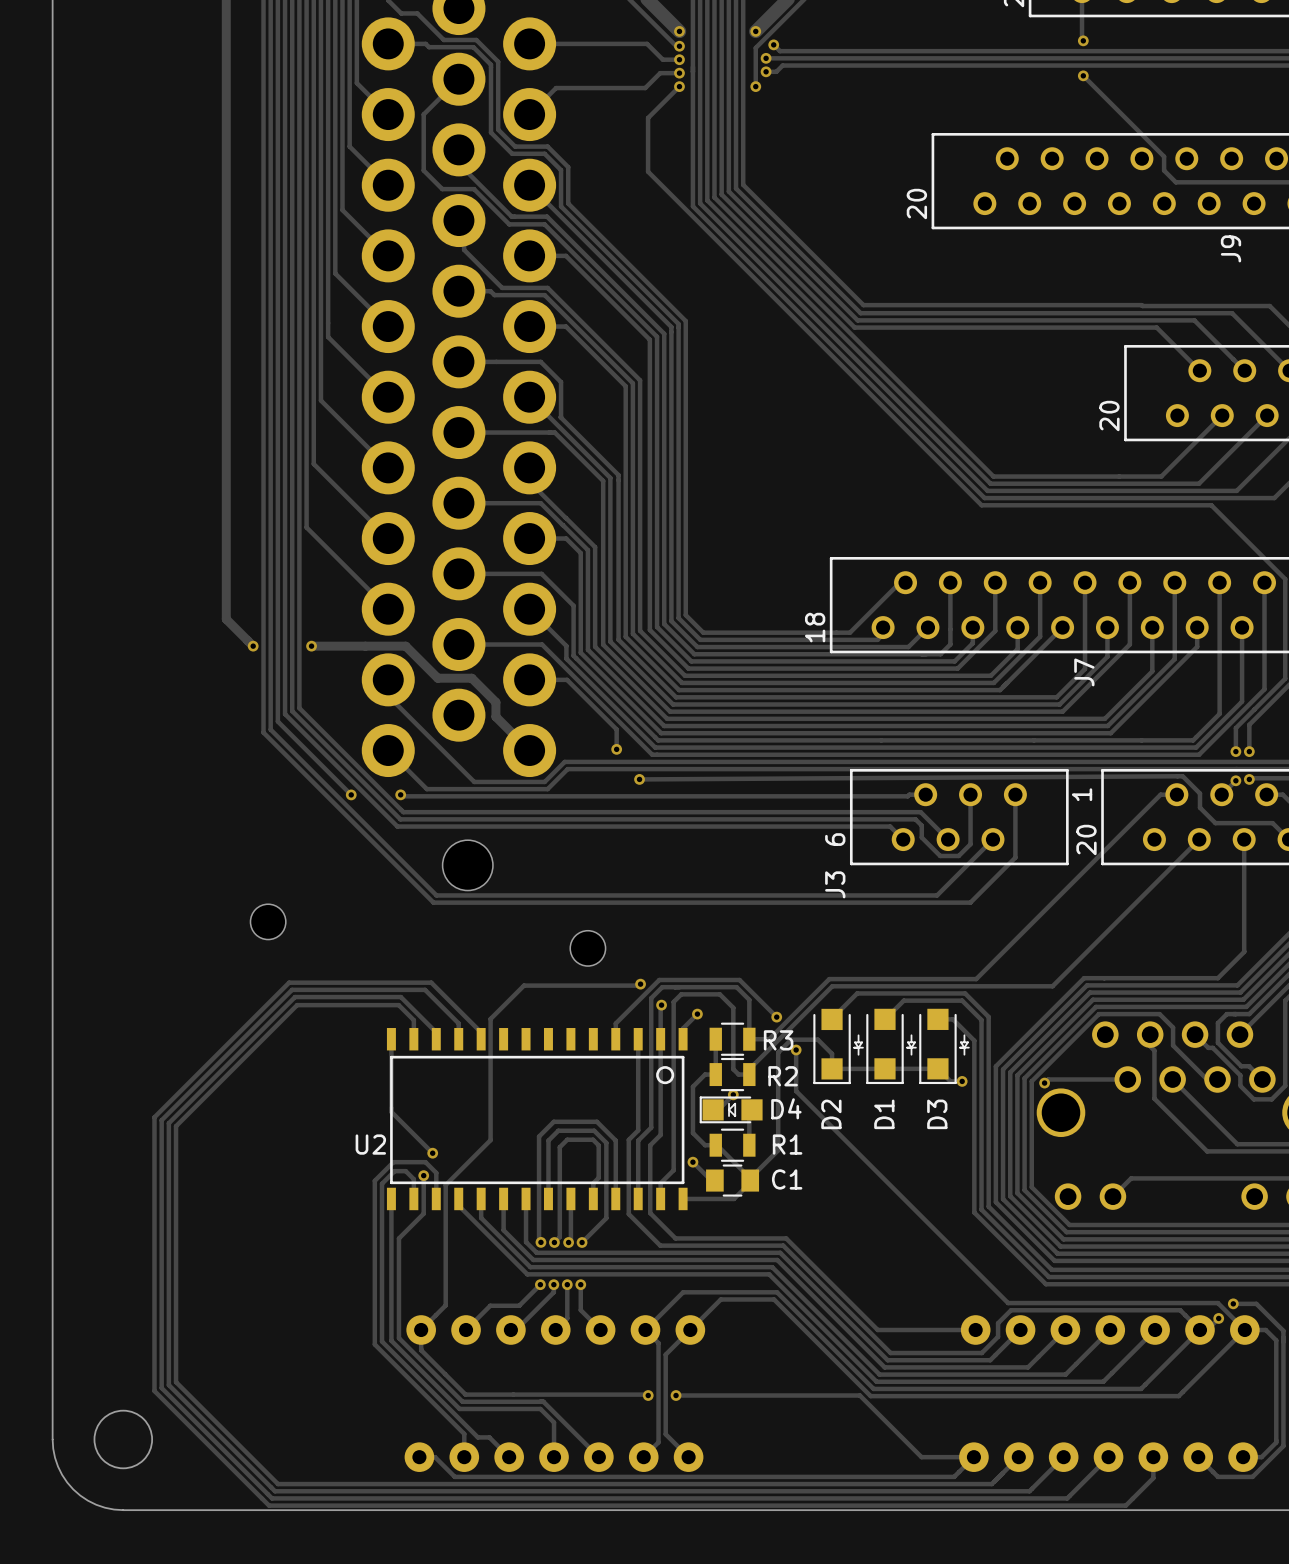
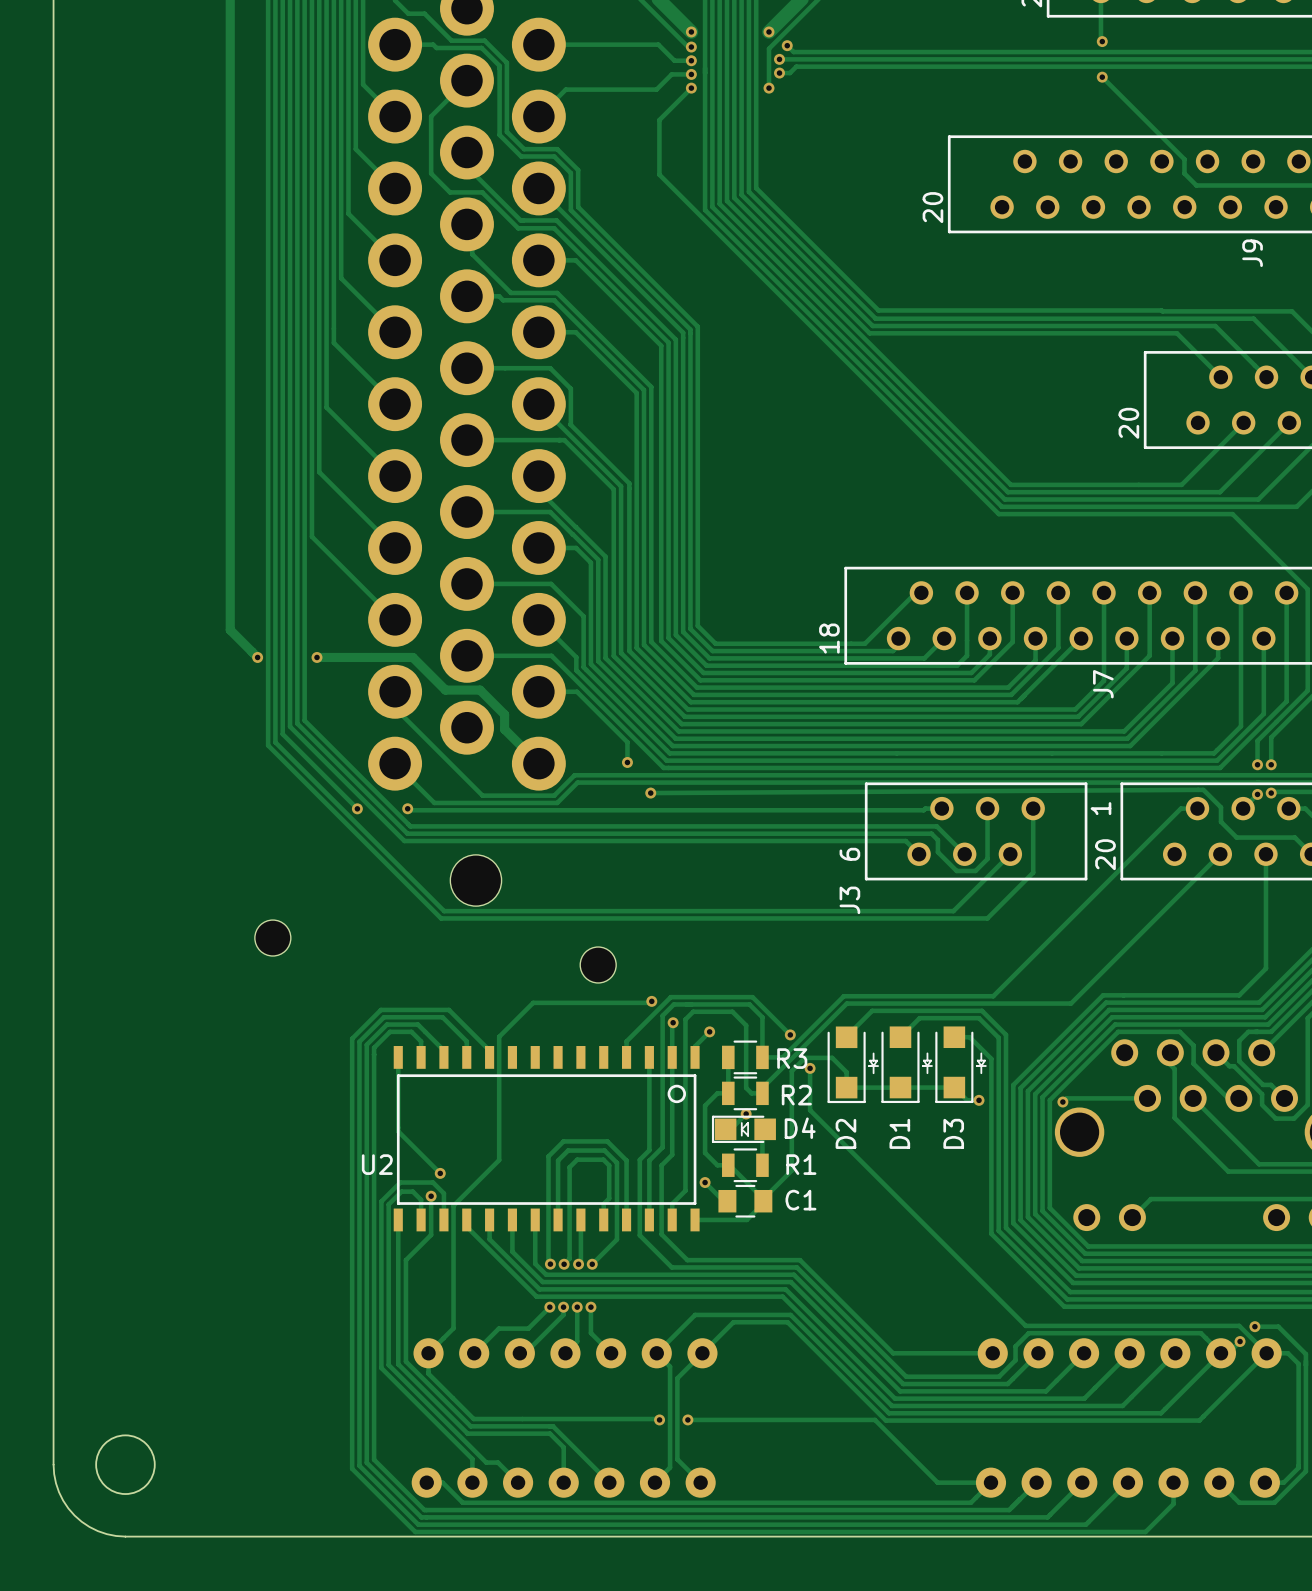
track: (441, 992) (431, 982) (289, 982) (154, 1117) (154, 1391) (269, 1505) (408, 1505) -> (448, 1009) (380, 1009) (352, 1038) (352, 1468) (415, 1531)
track: (434, 999) (425, 989) (292, 989) (161, 1120) (161, 1388) (272, 1498) (411, 1498) -> (442, 1017) (383, 1017) (359, 1041) (359, 1465) (418, 1524)
track: (410, 1006) (400, 997) (295, 997) (168, 1123) (168, 1385) (275, 1491) (414, 1491) -> (417, 1024) (387, 1024) (366, 1044) (366, 1462) (421, 1517)
track: (413, 1023) (413, 1020) (398, 1005) (297, 1005) (176, 1126) (176, 1382) (278, 1484) (417, 1484) -> (421, 1041) (411, 1031) (390, 1031) (374, 1047) (374, 1459) (424, 1510)

